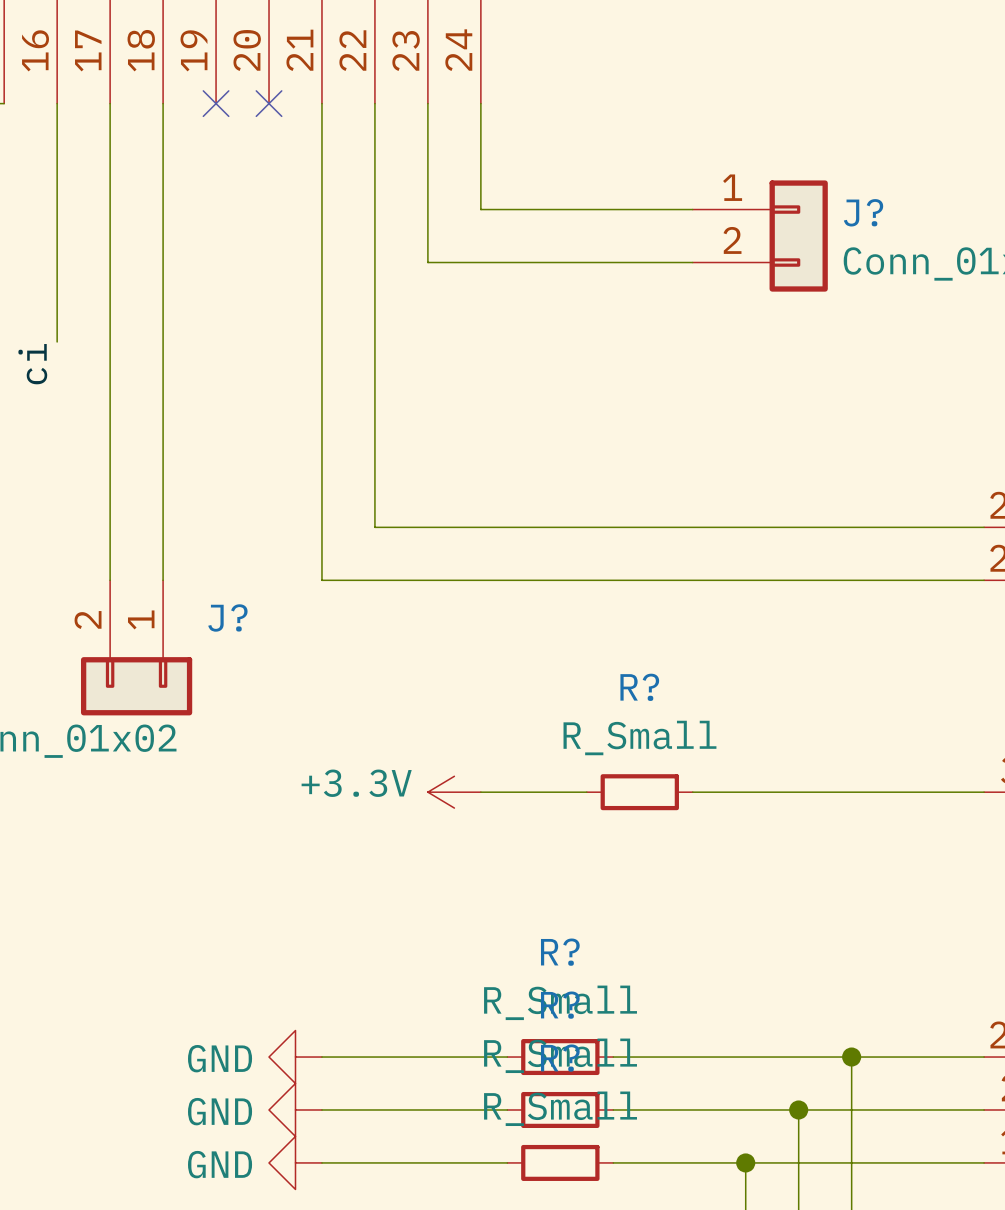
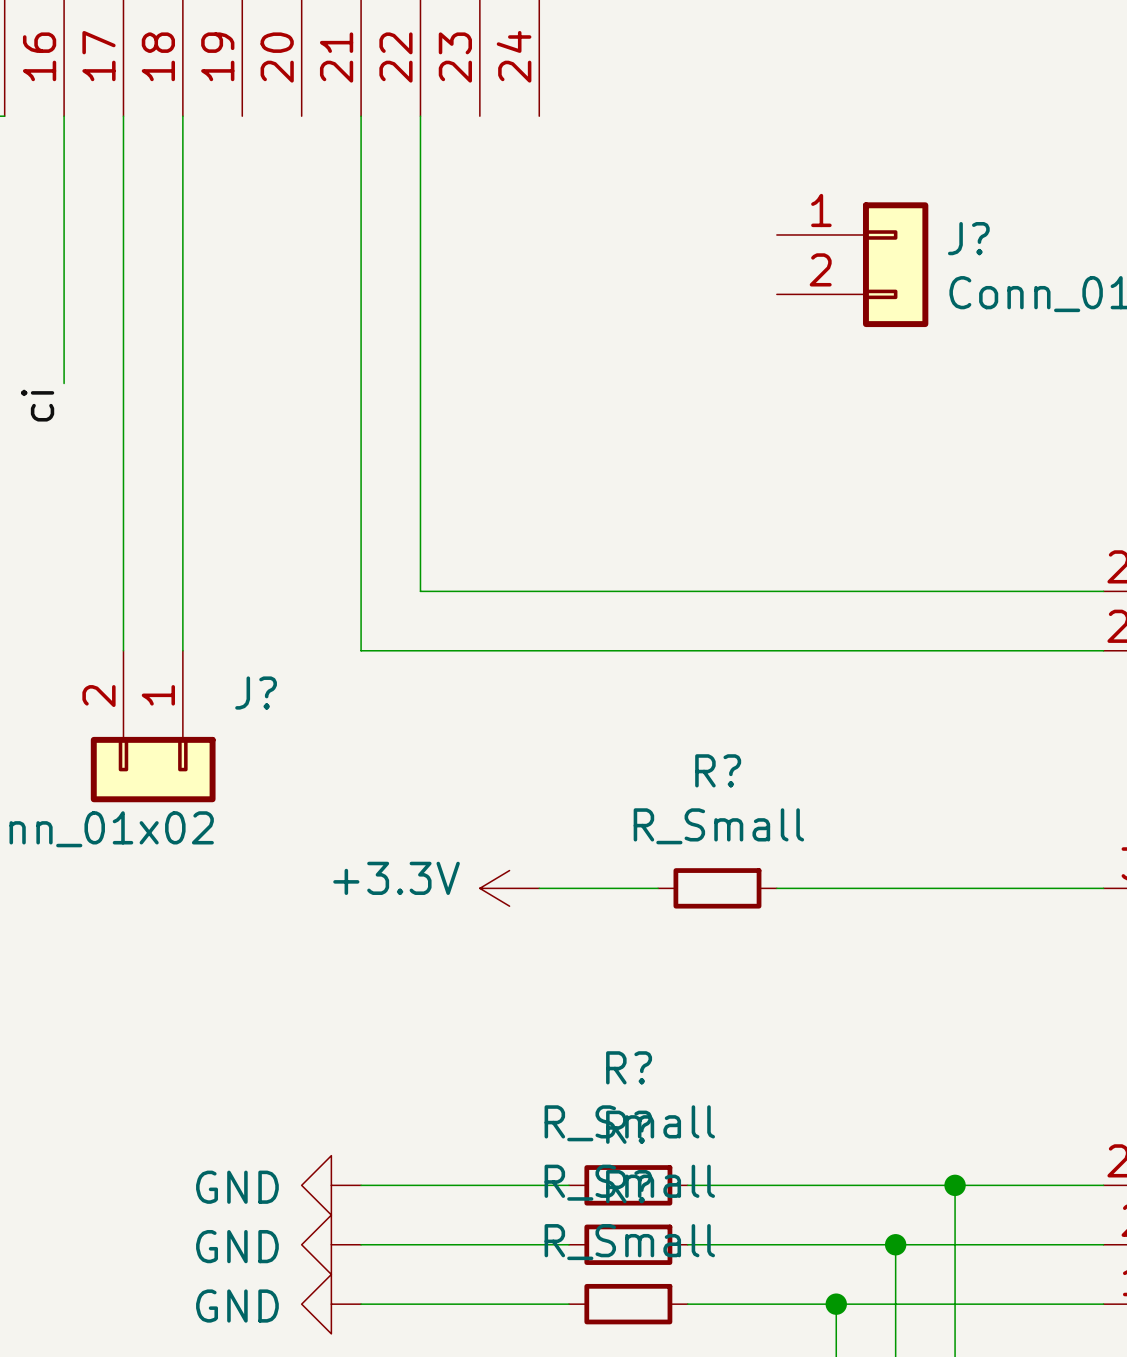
no-connect mark: (216, 103) -> none
no-connect mark: (269, 103) -> none
wire: (427, 103) (427, 262) (692, 262) -> none
wire: (480, 103) (480, 209) (692, 209) -> none

